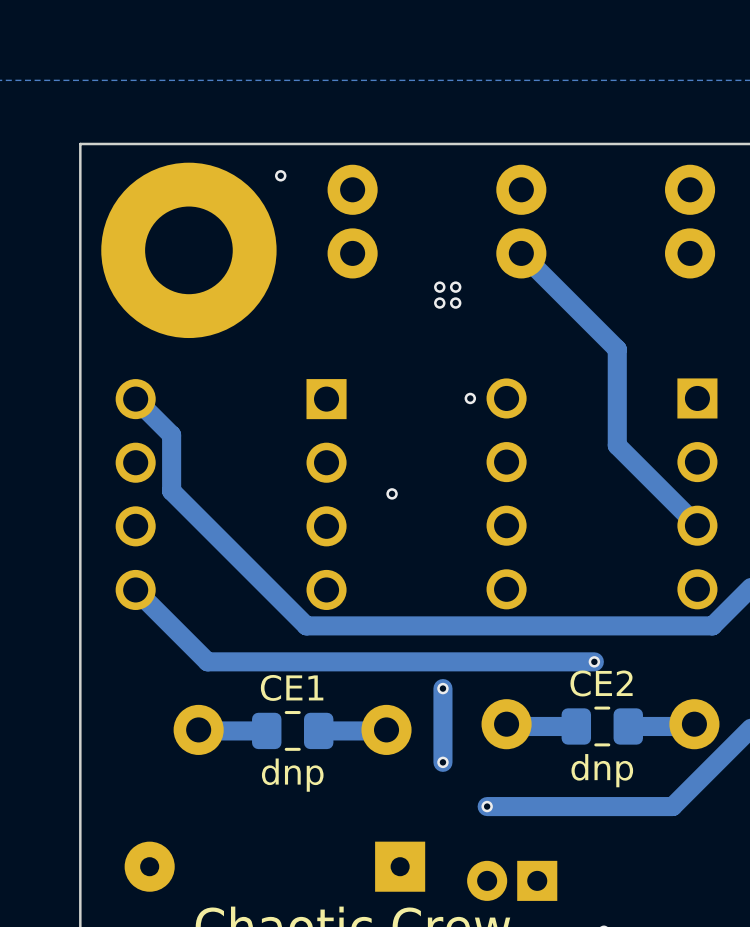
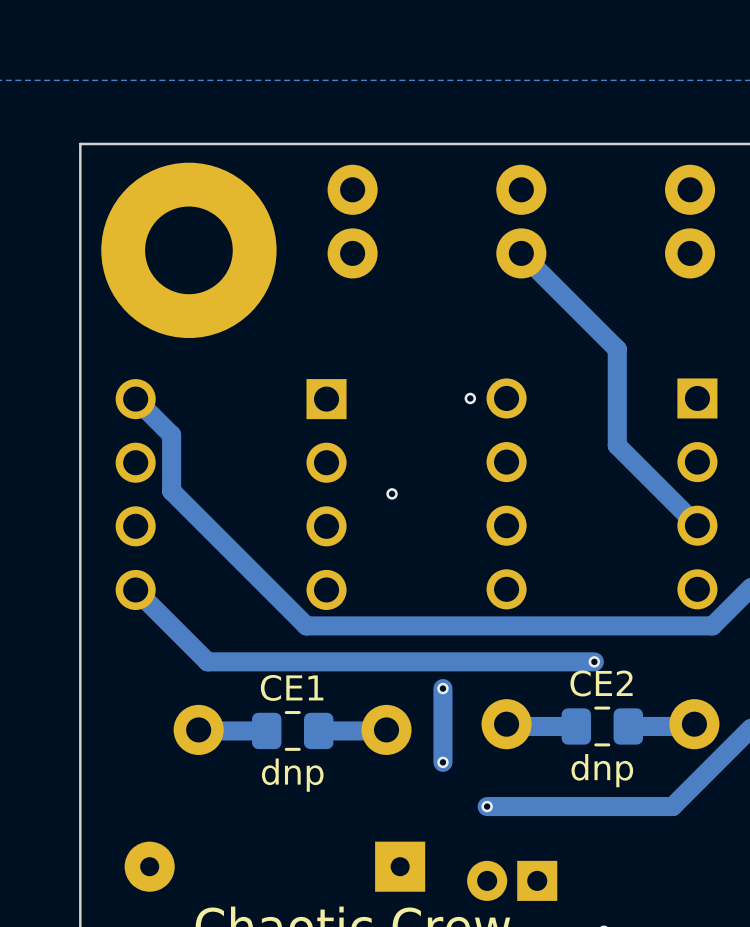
via: (280, 175) -> none
via: (439, 287) -> none
via: (455, 287) -> none
via: (439, 303) -> none
via: (455, 303) -> none

